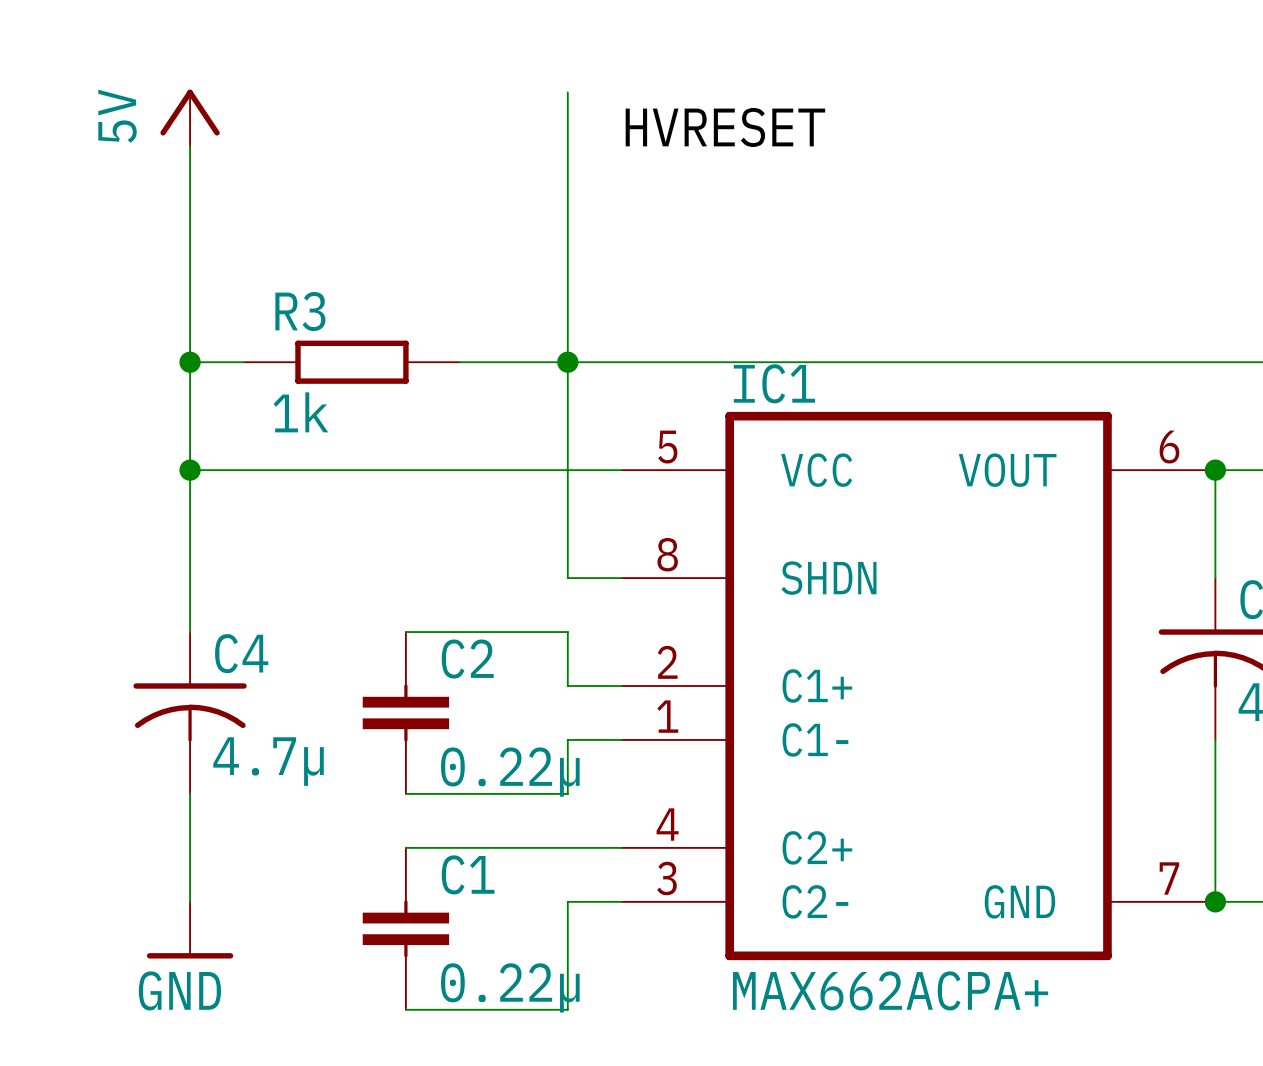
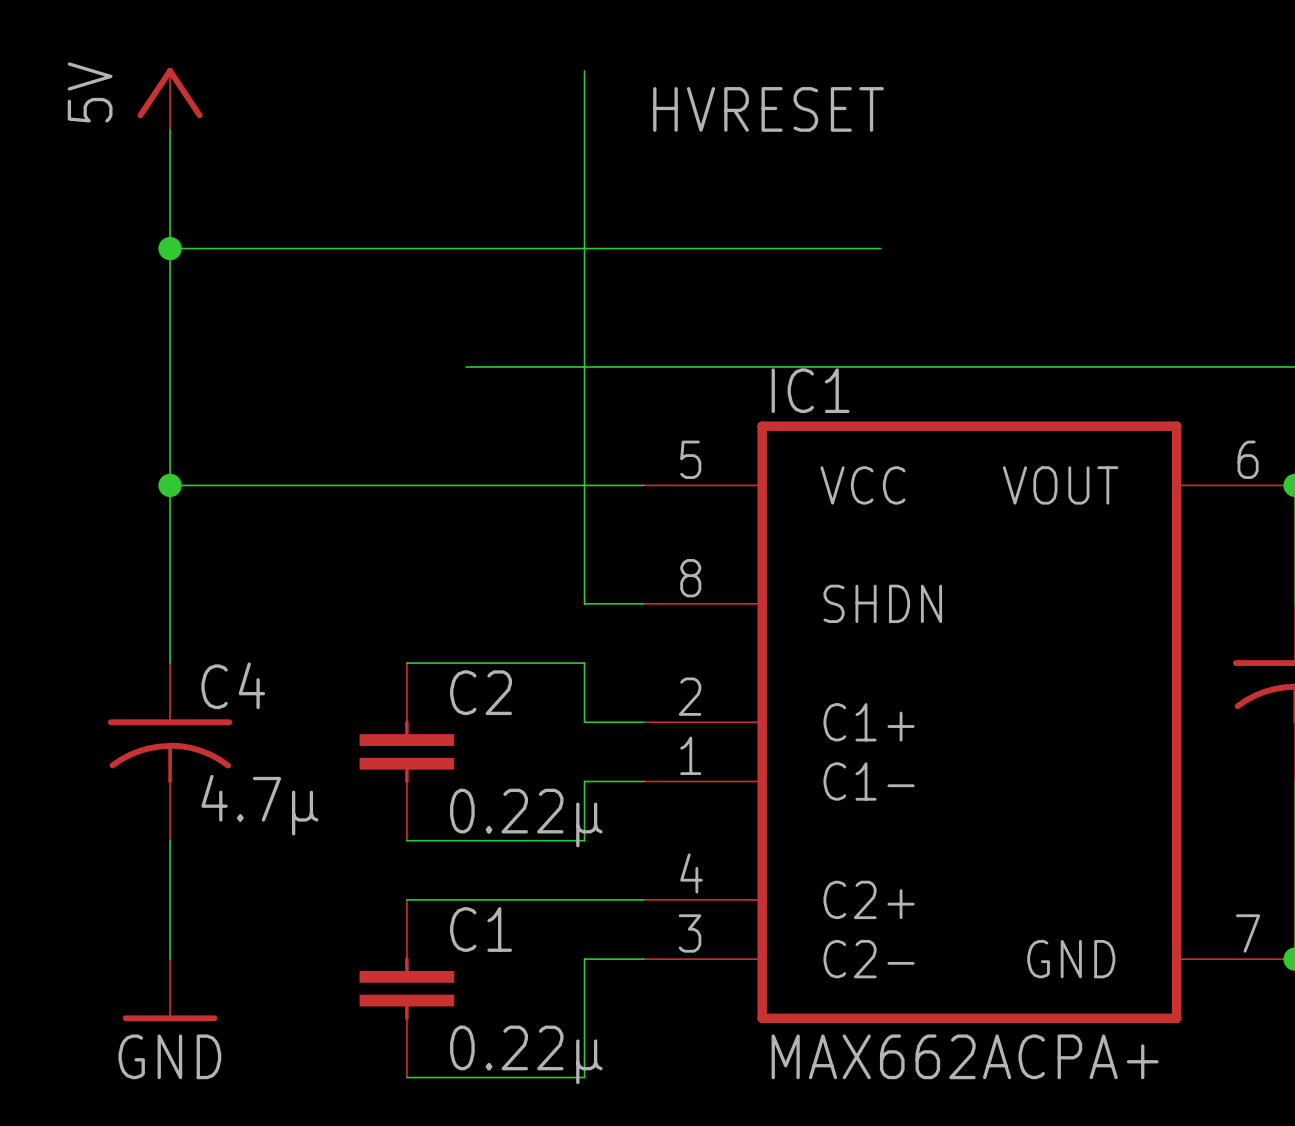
wire: none -> (170, 248) (880, 248)
wire: (190, 362) (244, 362) -> none
junction position: (190, 362) -> (170, 248)
R3: 1k (351, 362) -> none
junction: (567, 362) -> none

